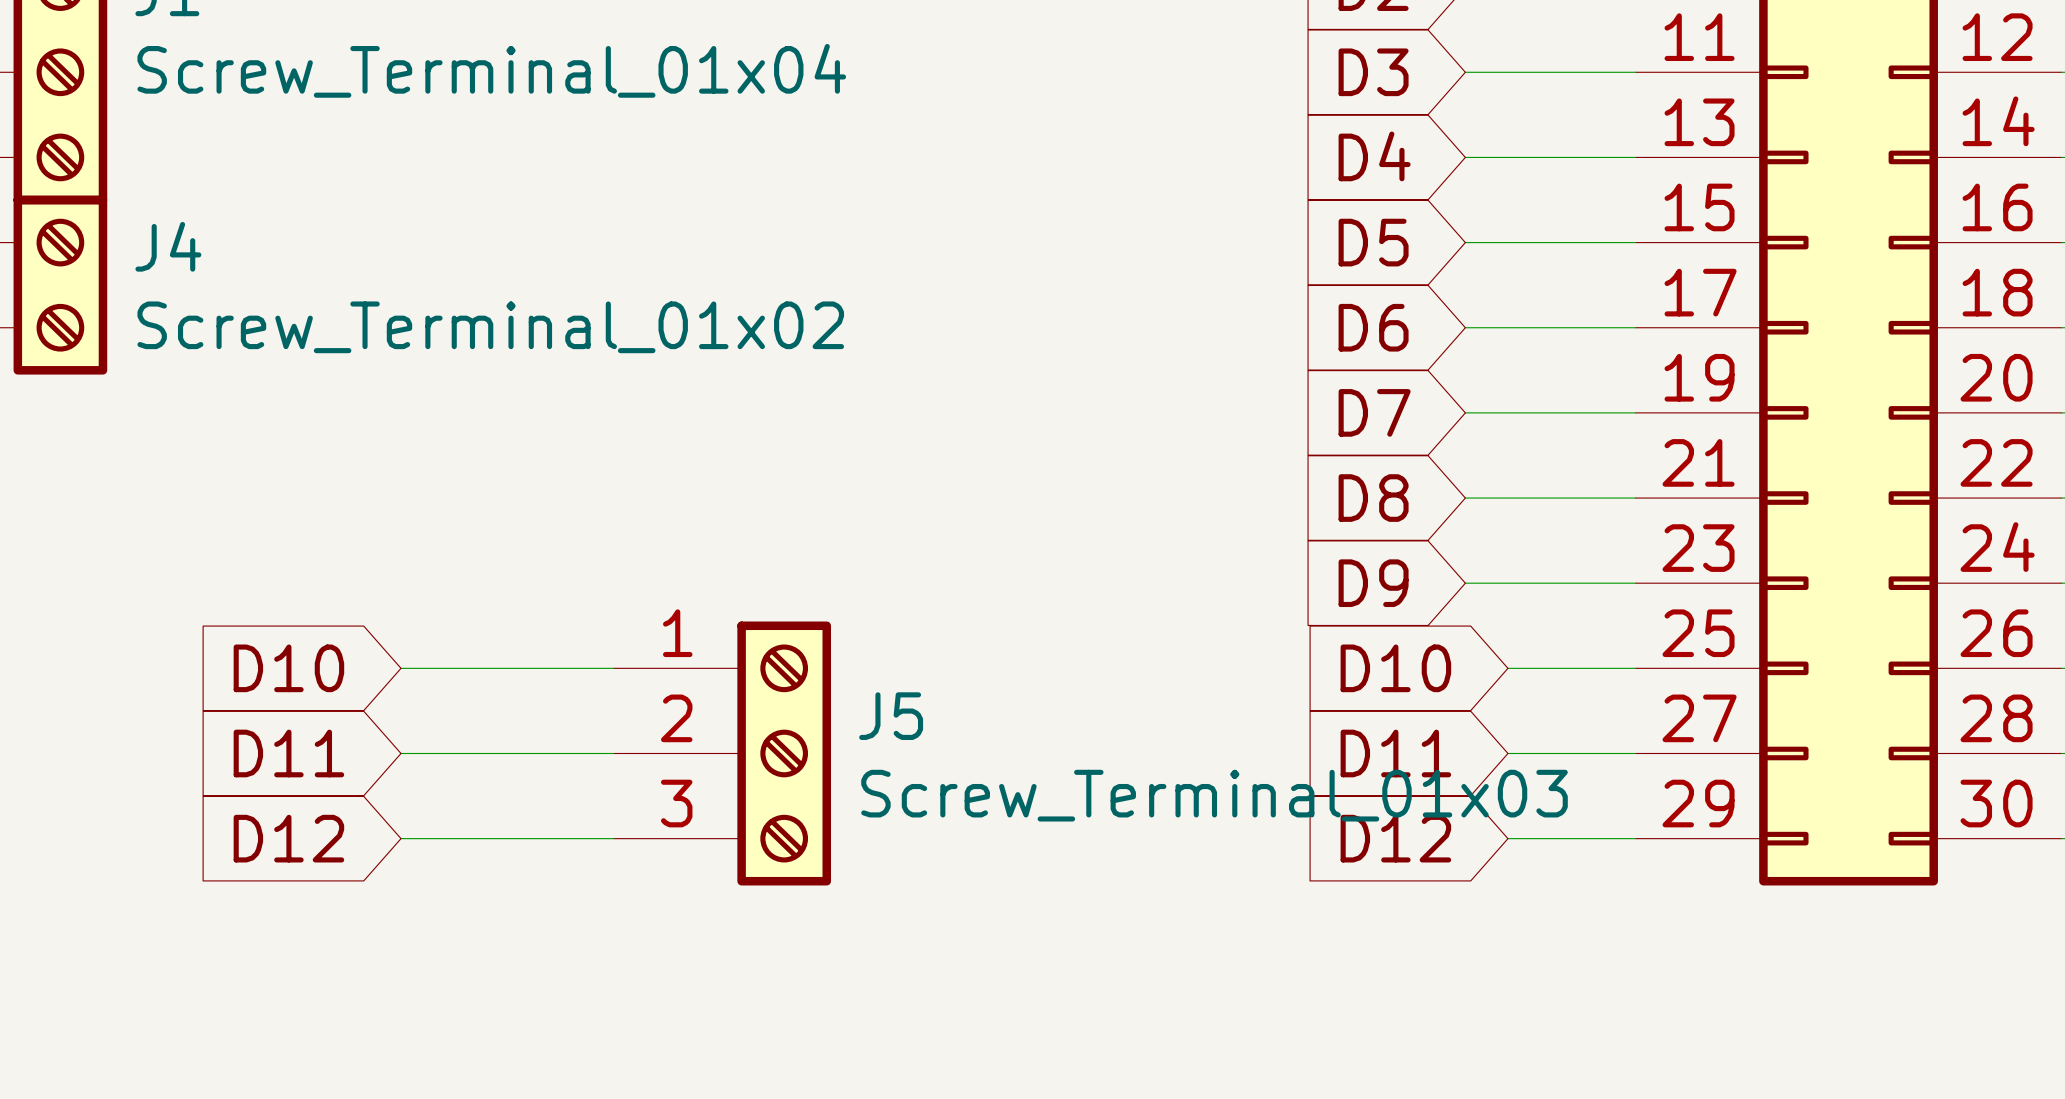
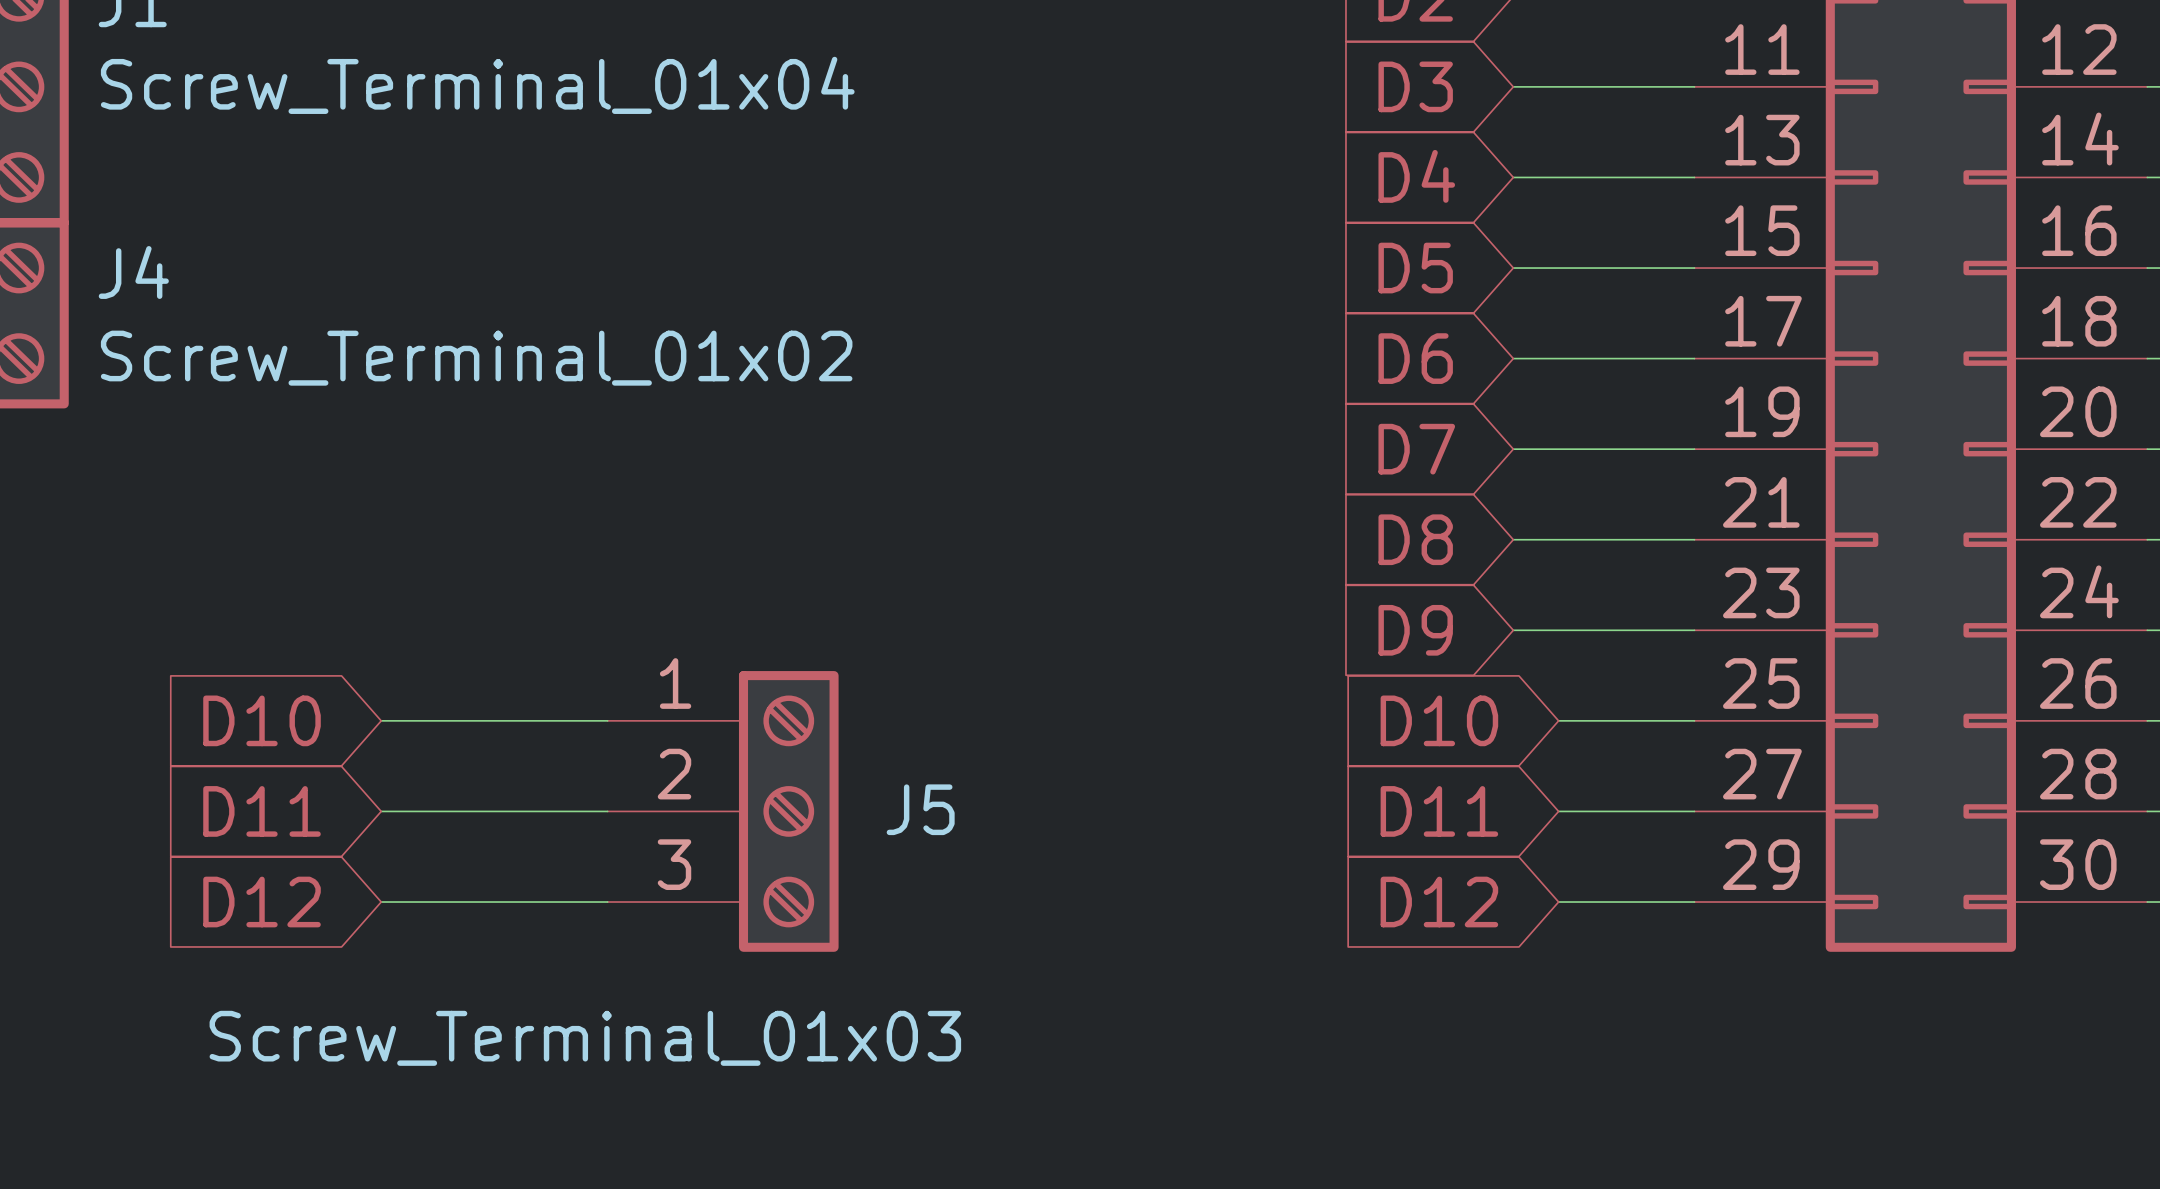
J5 name position: J5 (891, 716) -> J5 (920, 809)
J5 value position: Screw_Terminal_01x03 (1214, 795) -> Screw_Terminal_01x03 (585, 1038)

